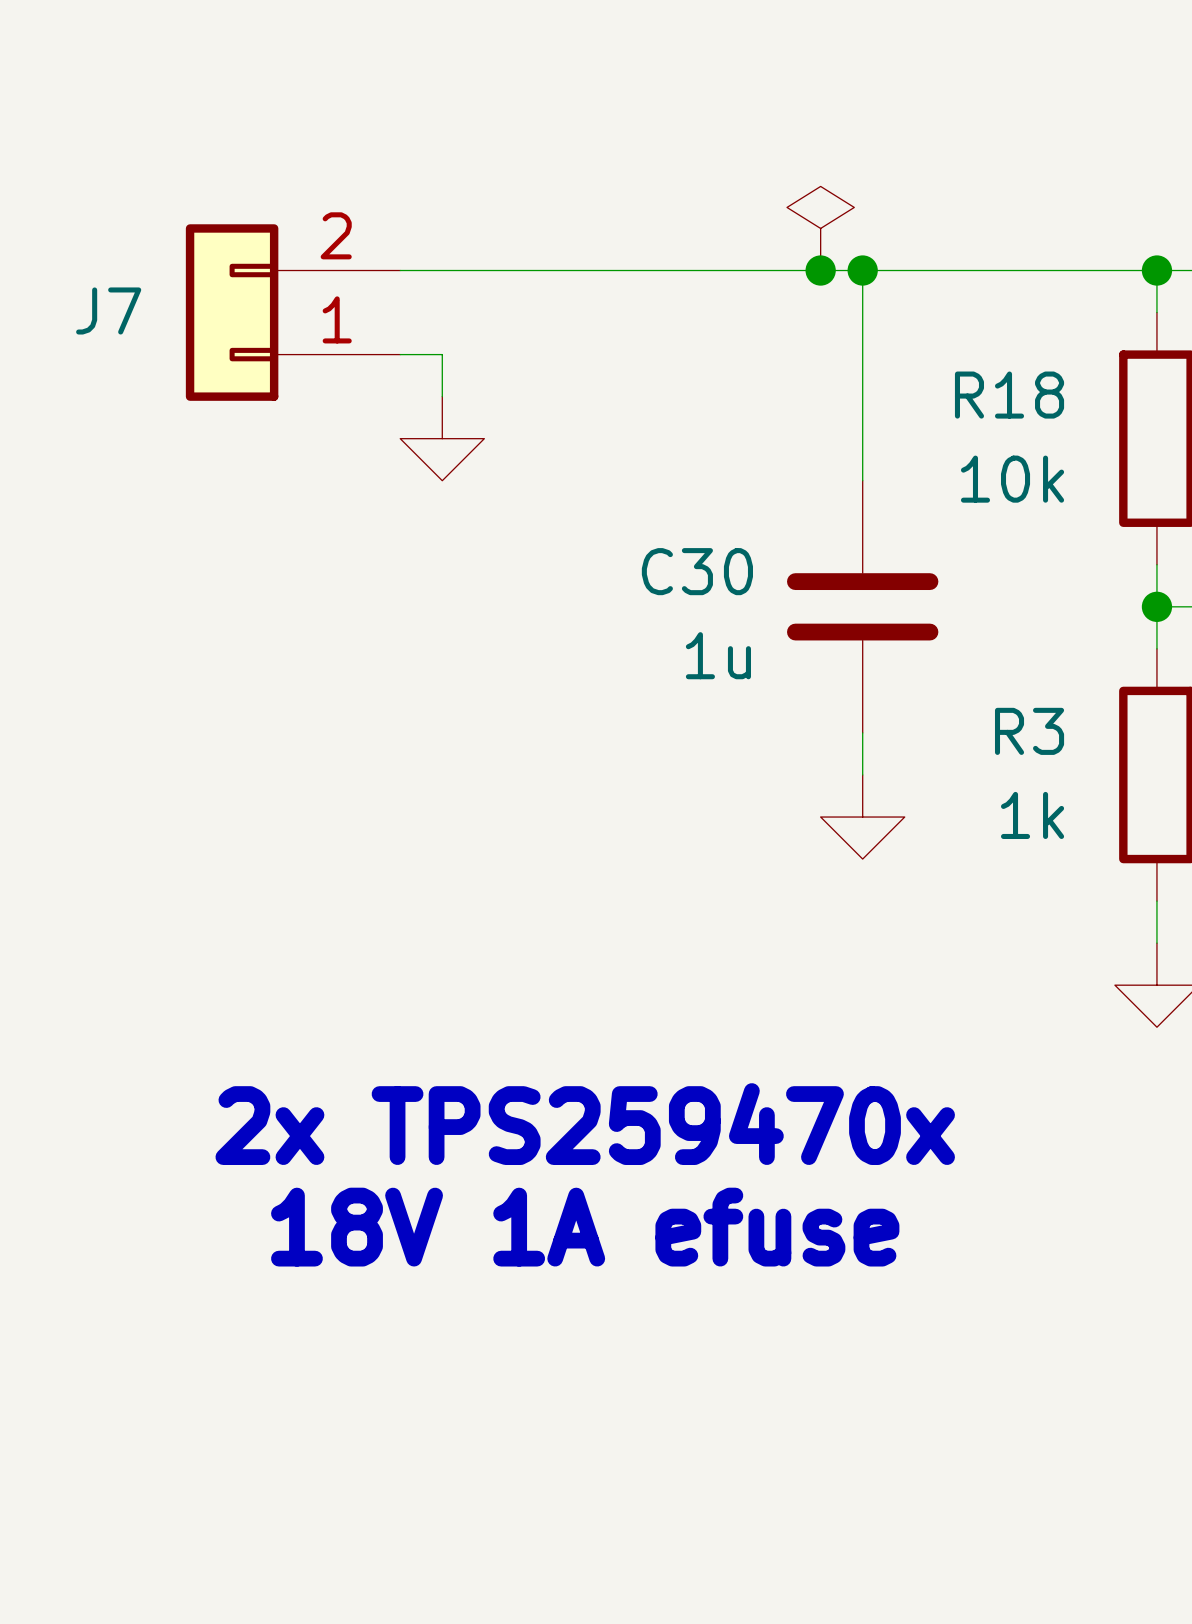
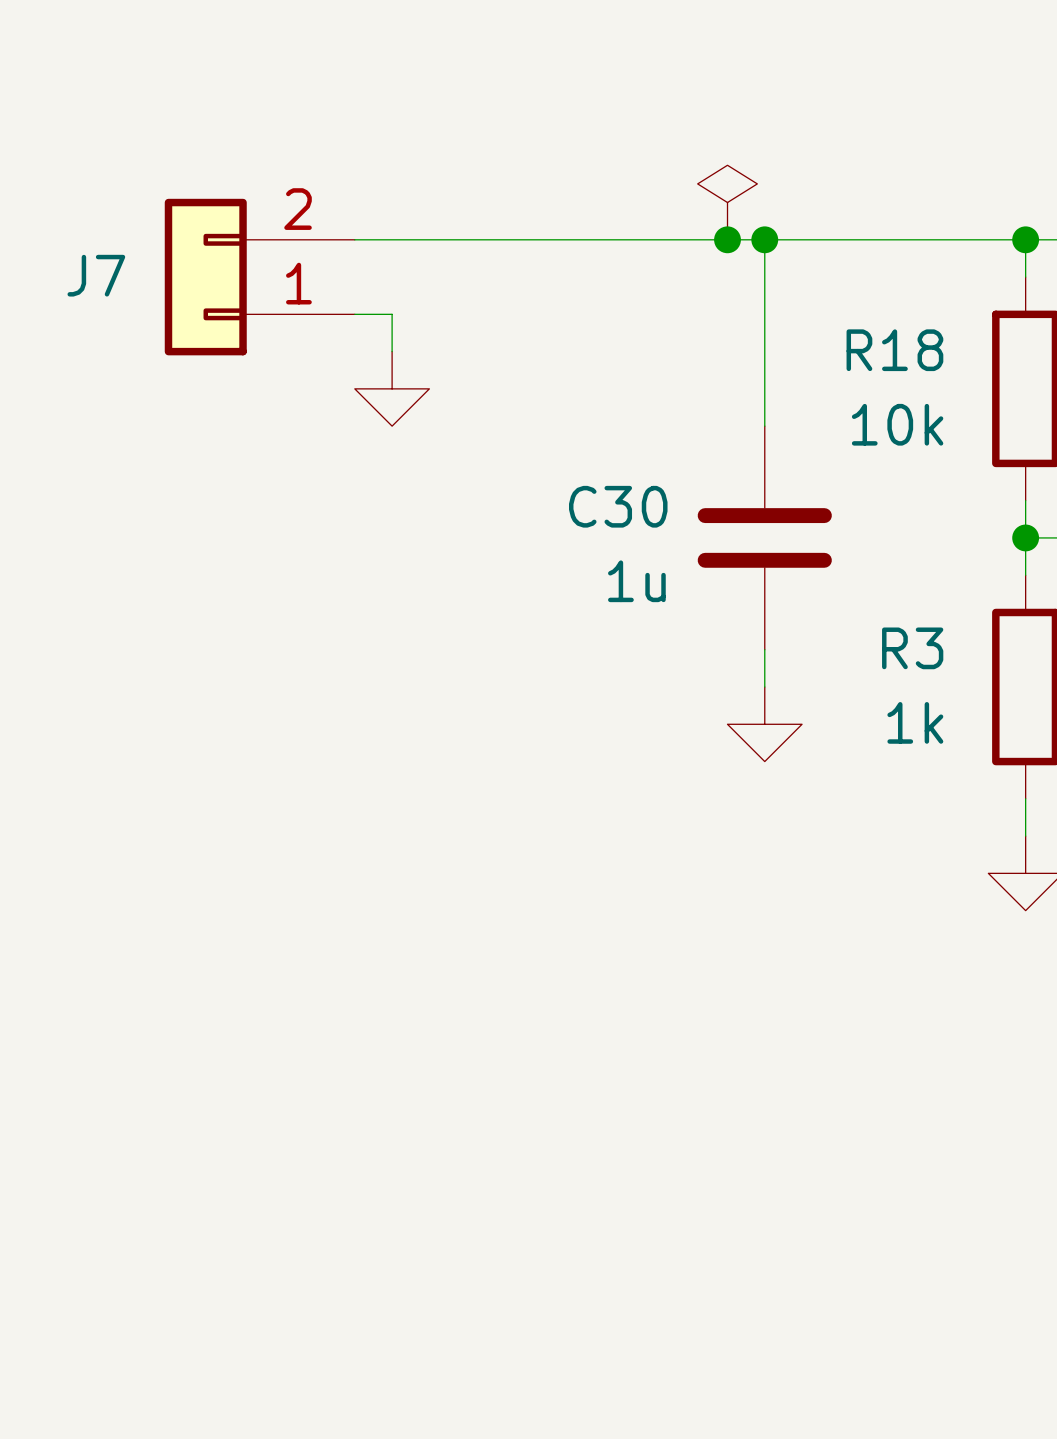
text: 2x TPS259470x (585, 1124) -> none
text: 18V 1A efuse (585, 1227) -> none

